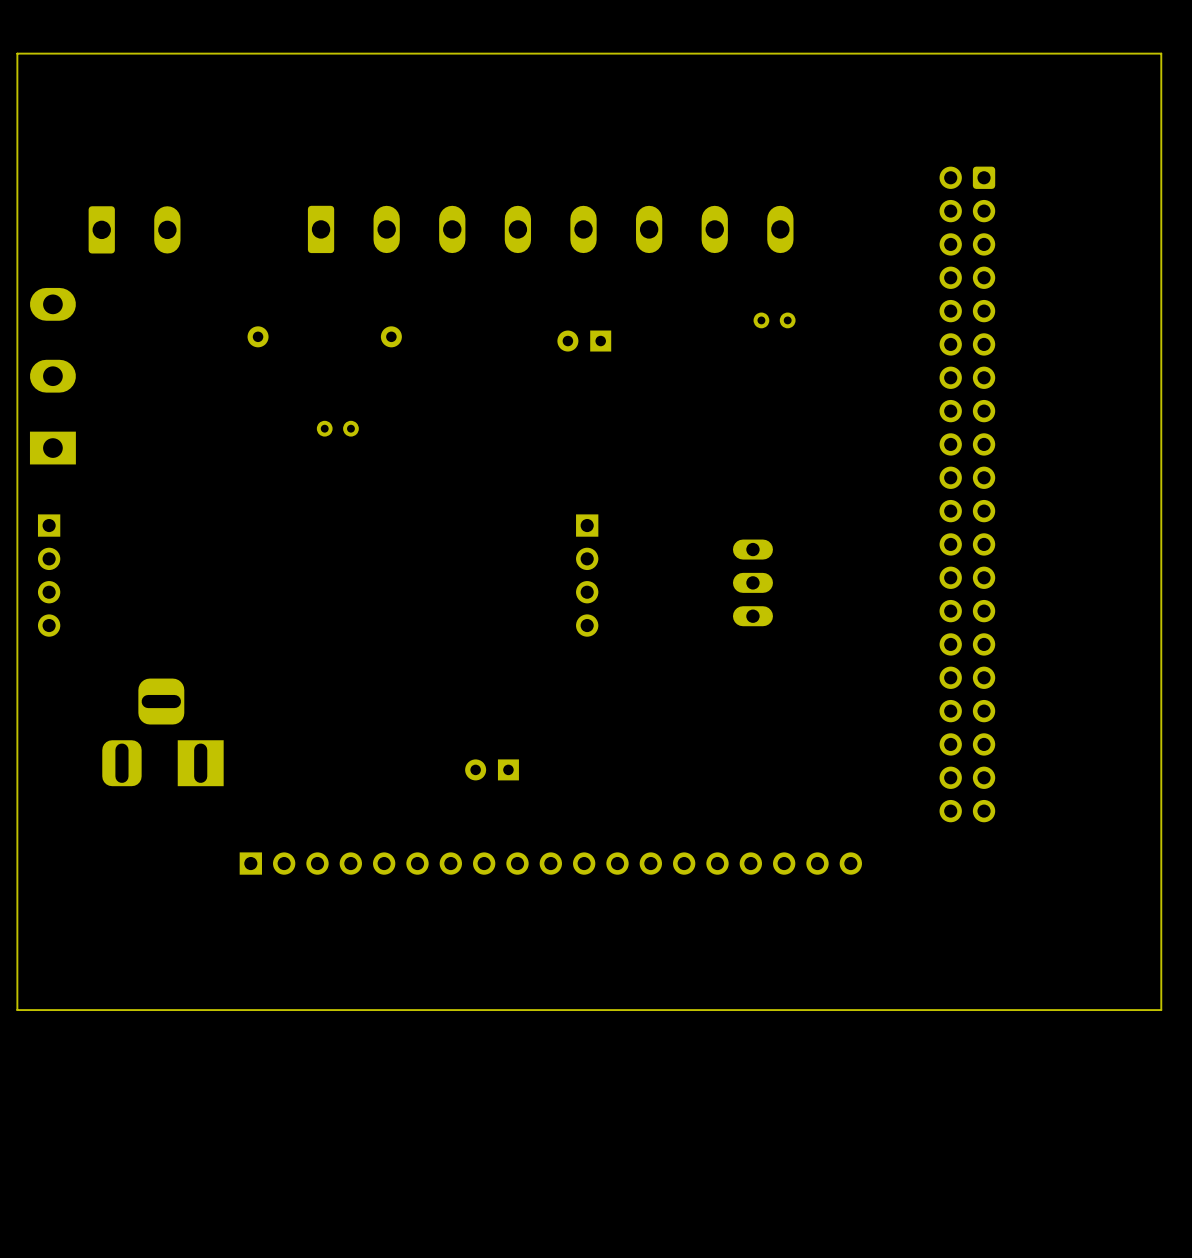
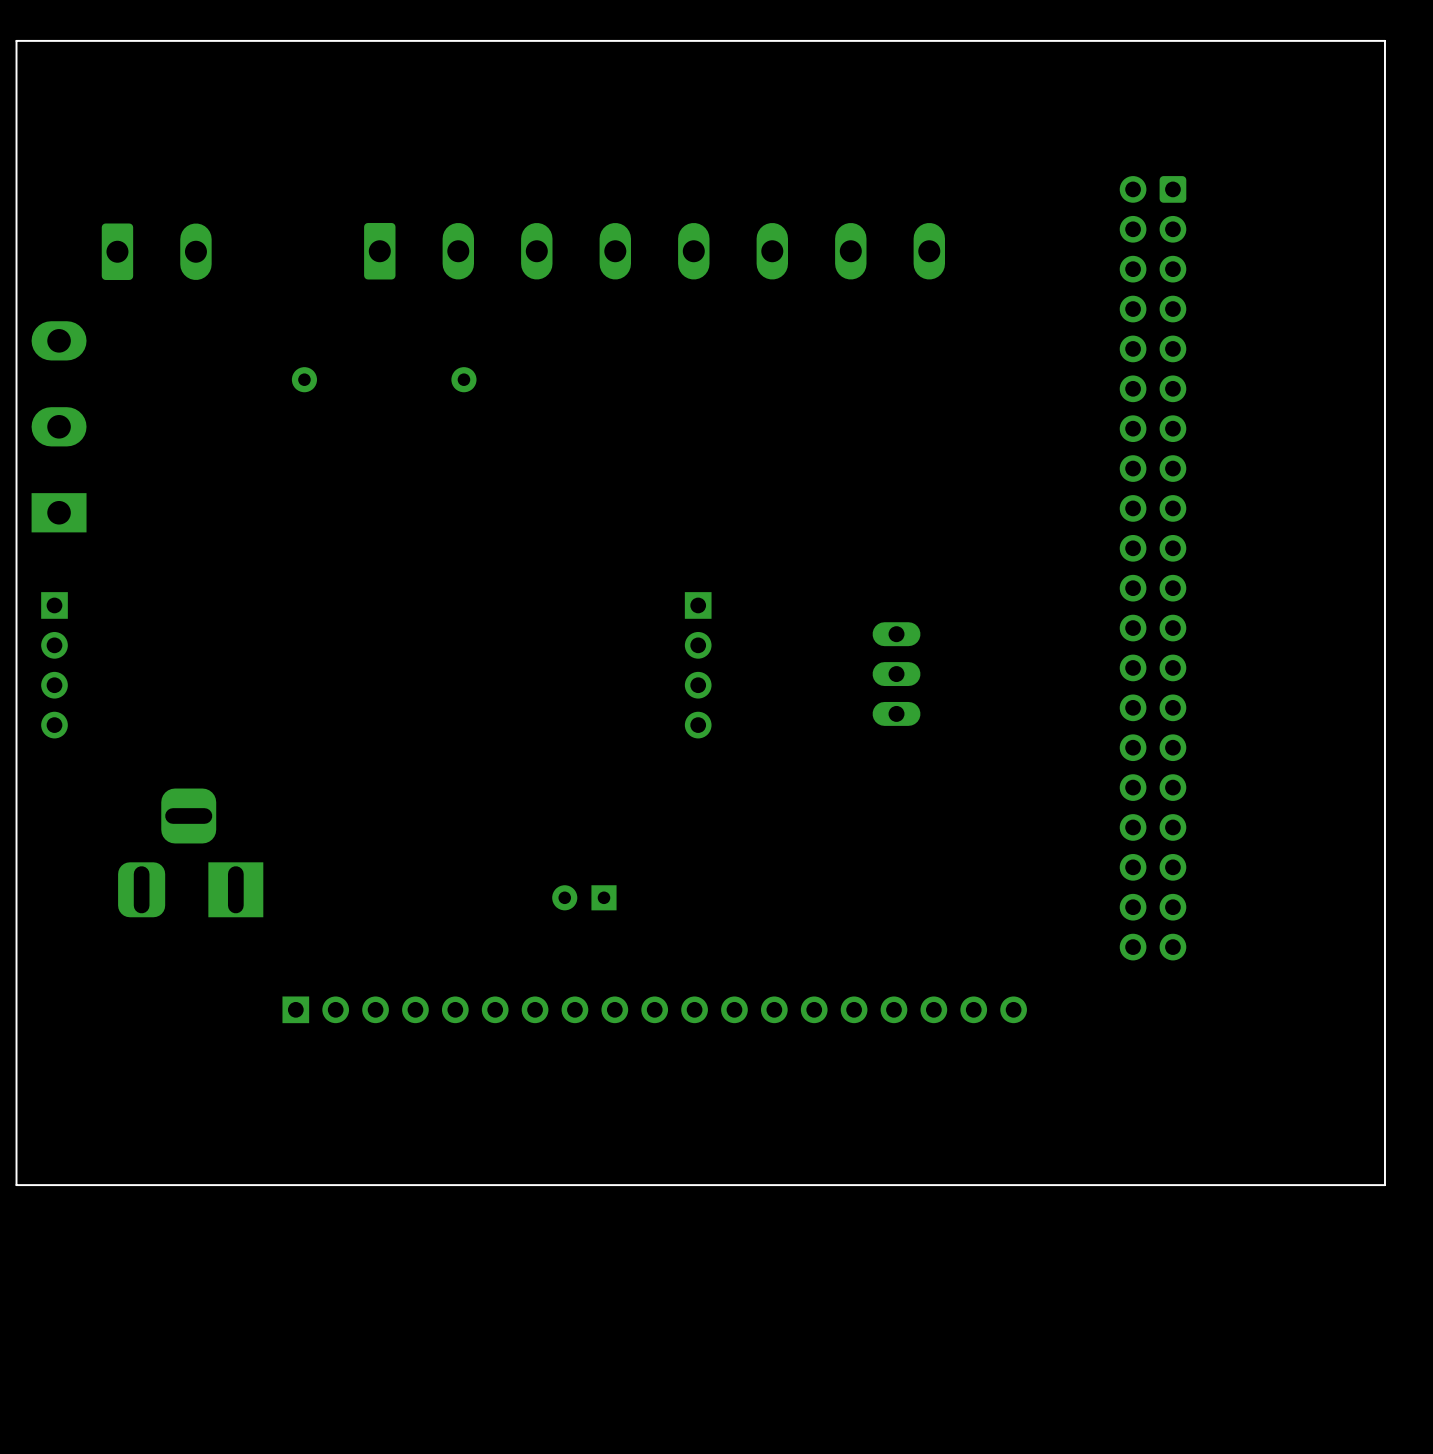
part: (774, 320) -> none
part: (584, 341) -> none
part: (337, 428) -> none

